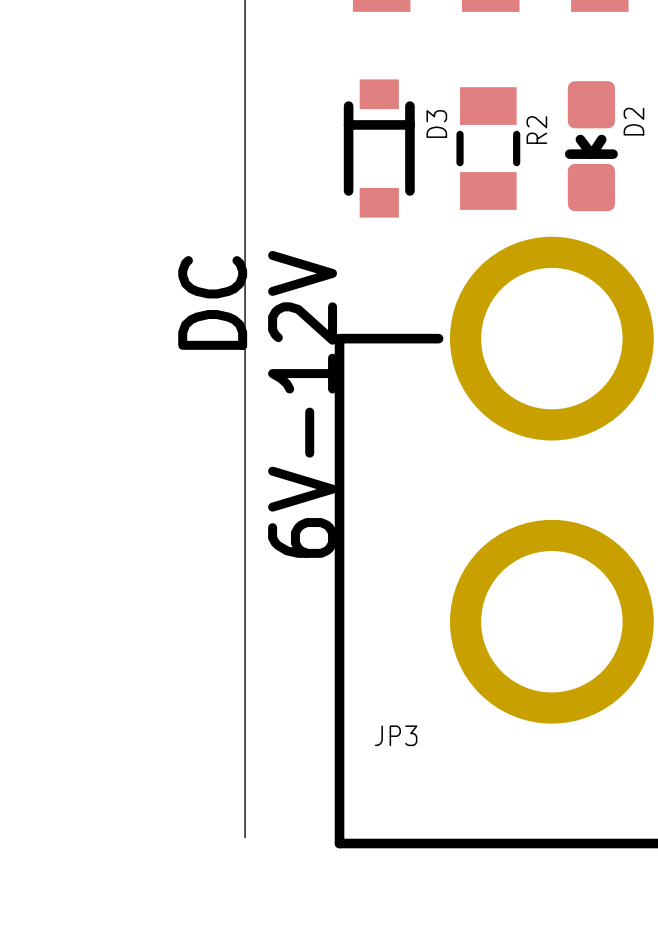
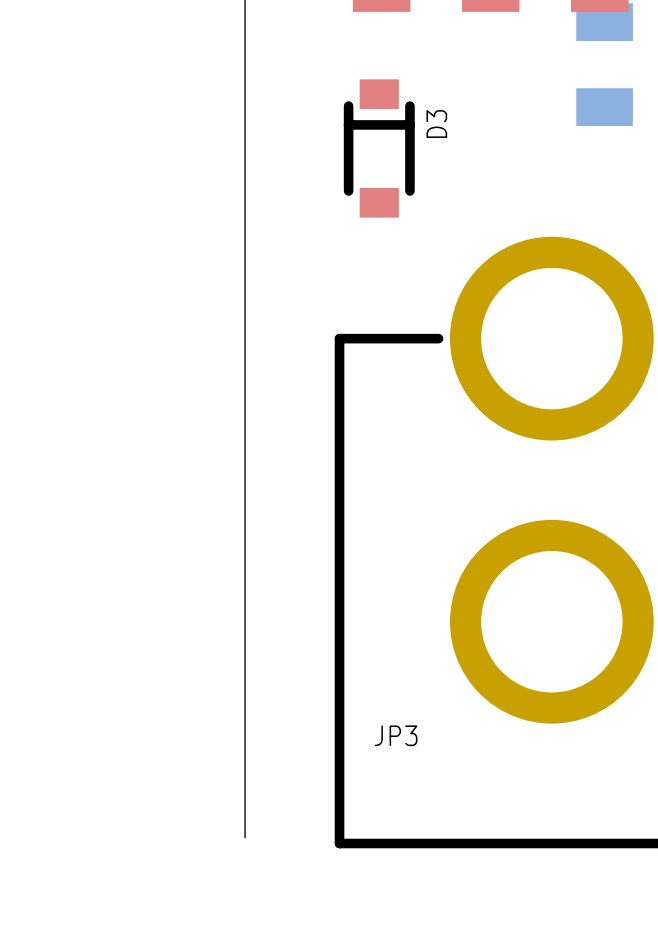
D2: (591, 146) -> none
R2 side: top (488, 148) -> bottom (604, 64)
text: DC (212, 302) -> none
text: 6V-12V (302, 404) -> none

